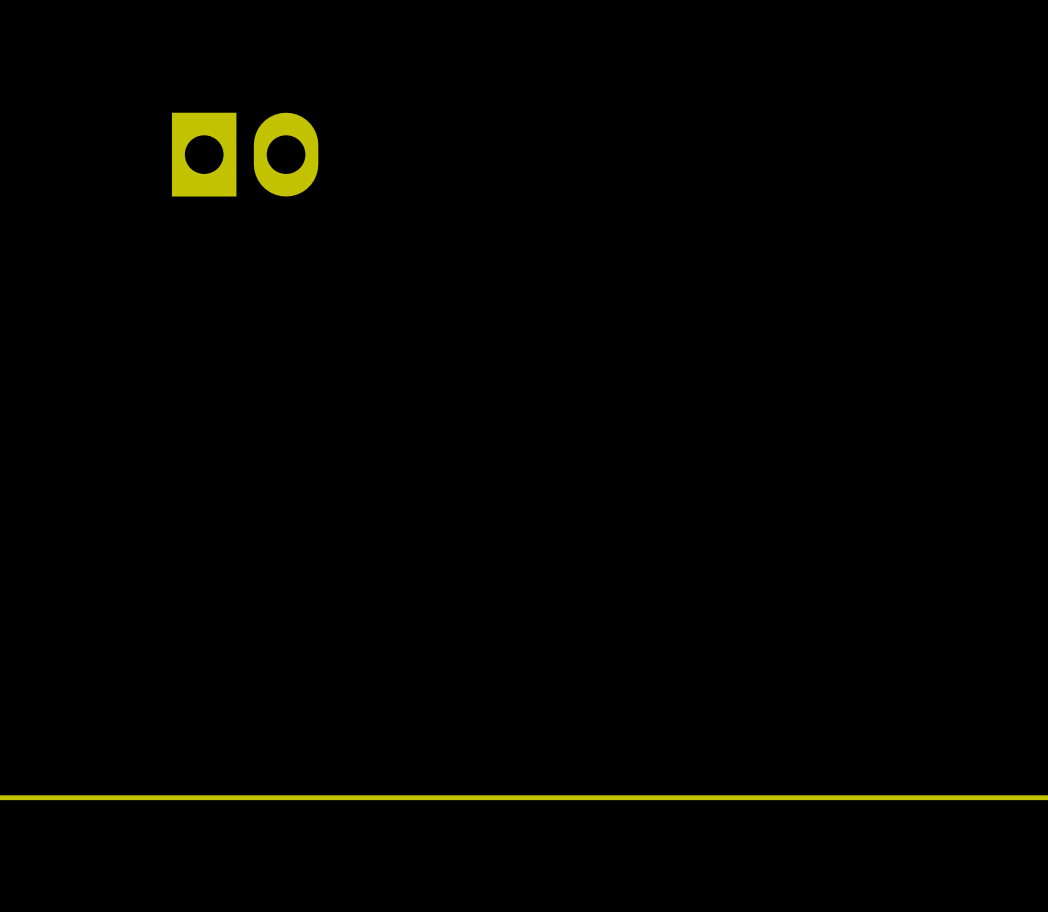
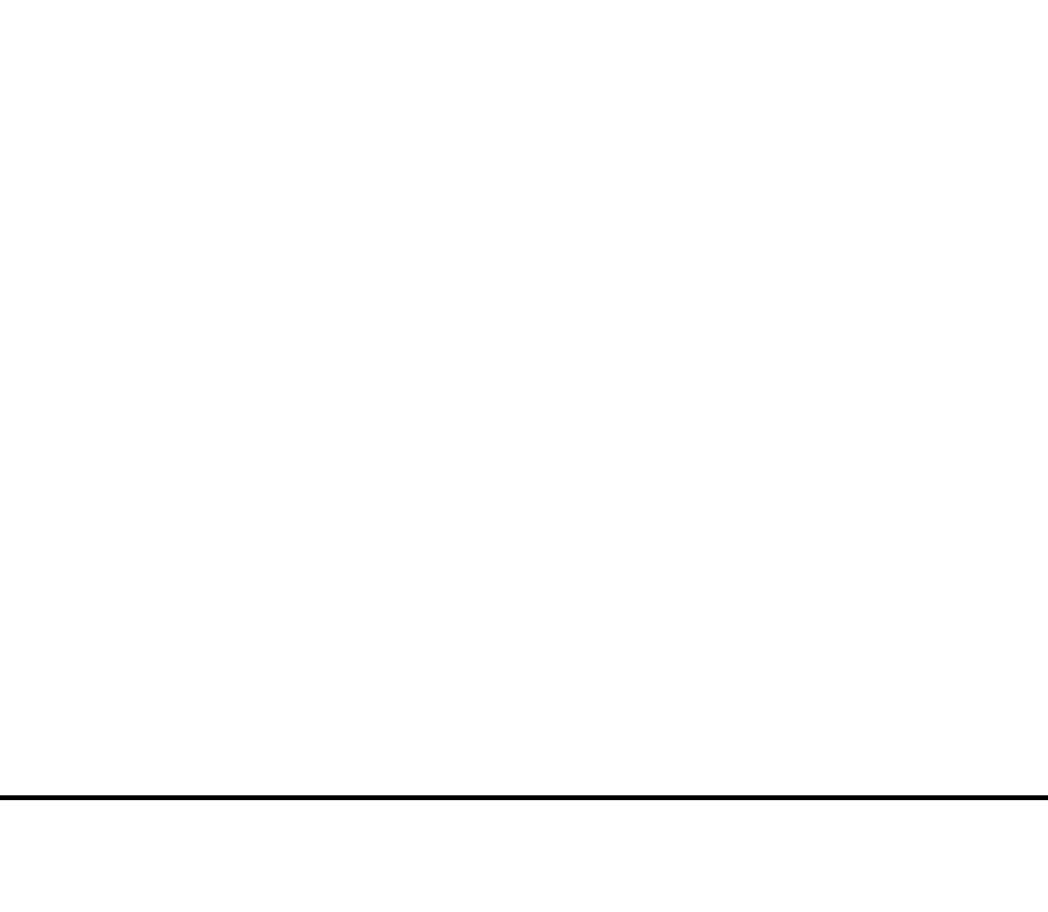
part: (245, 154) -> none

